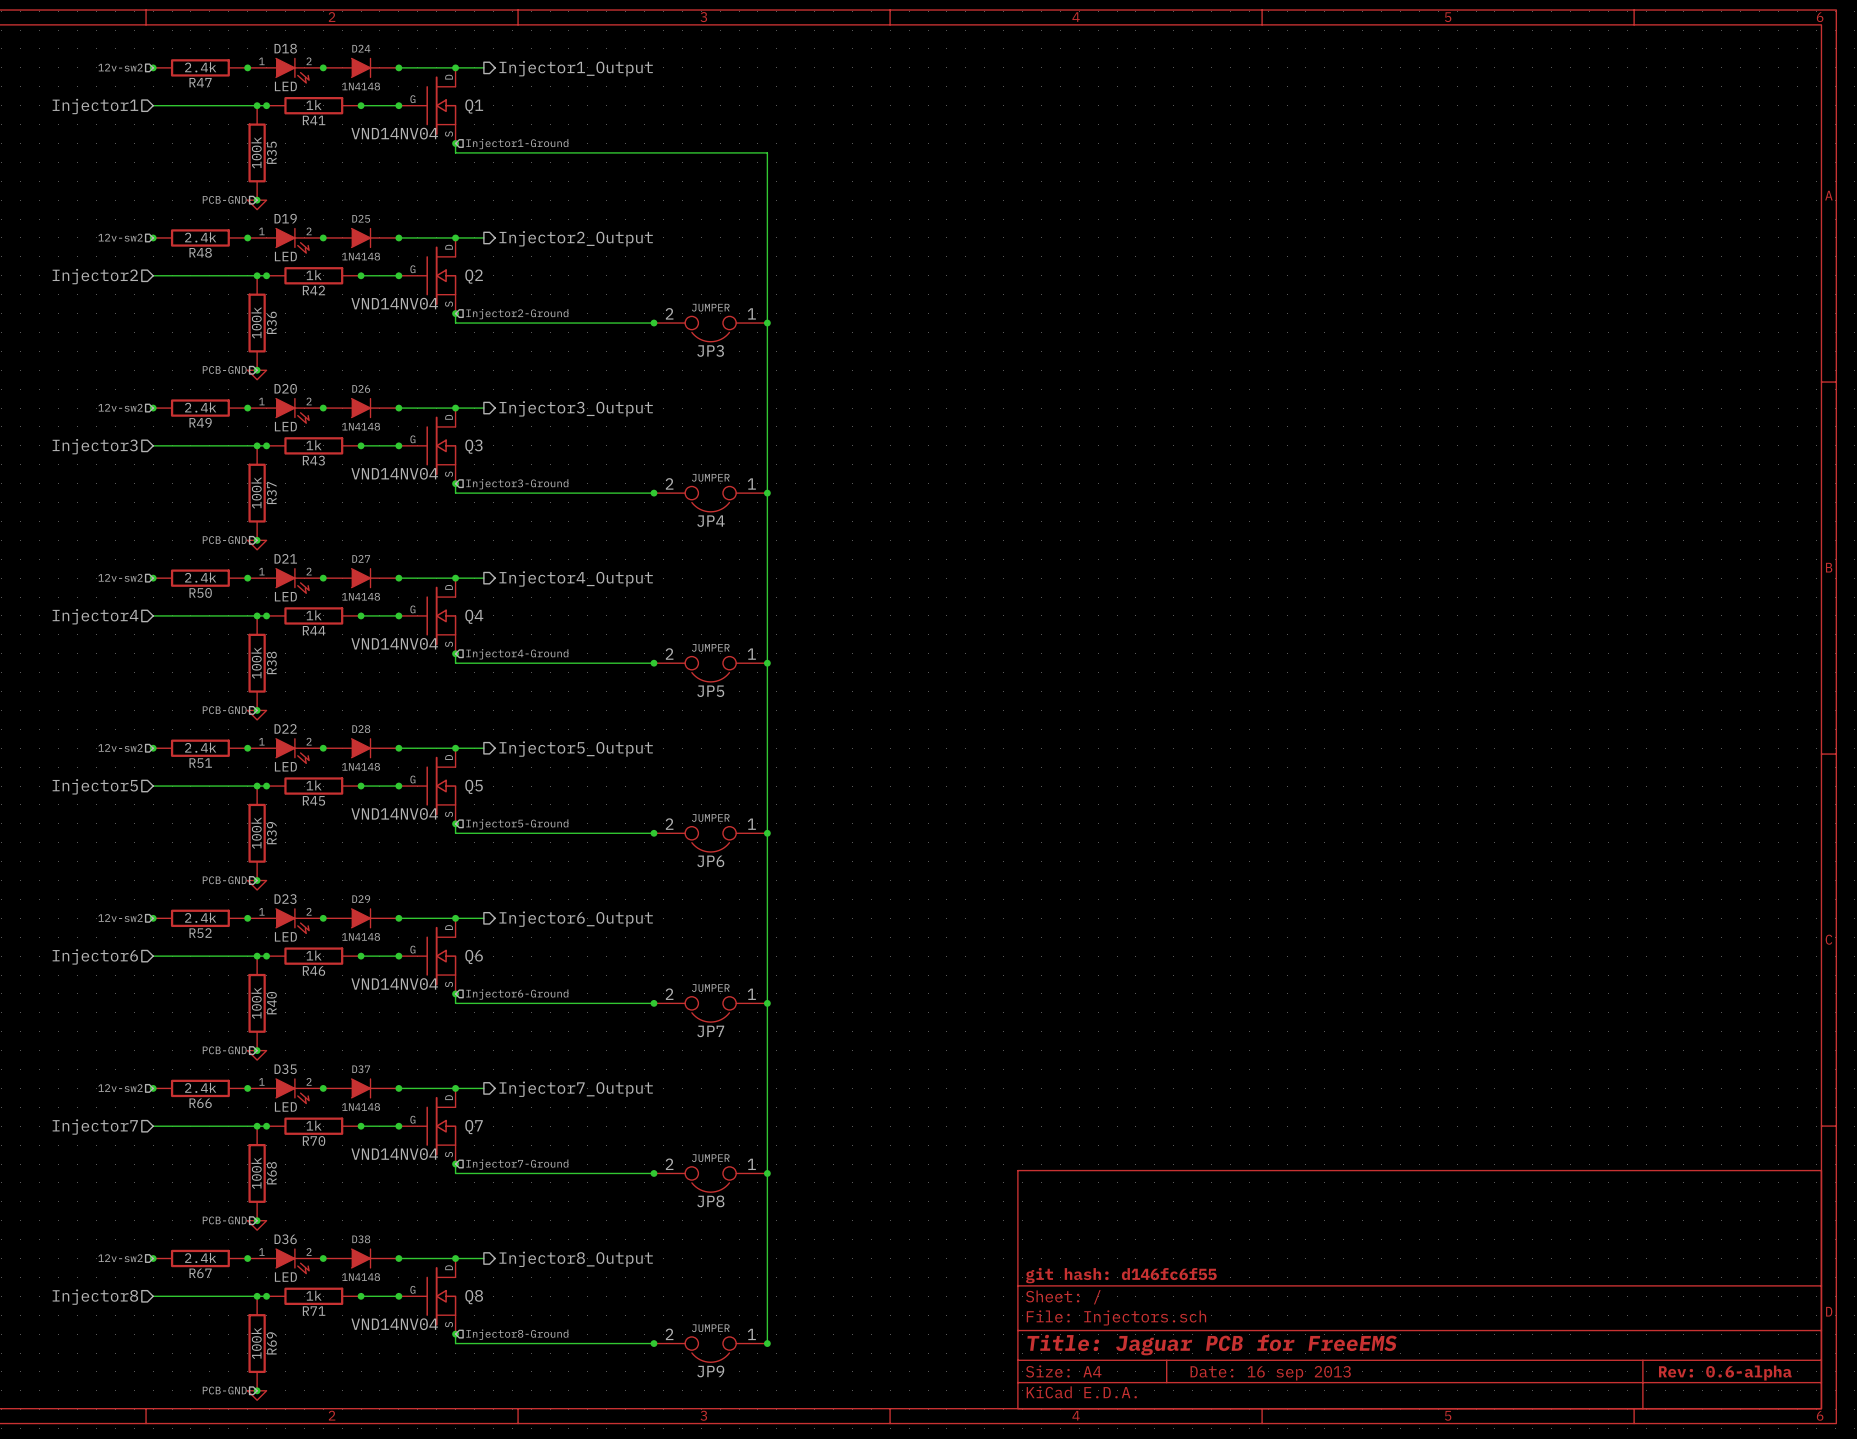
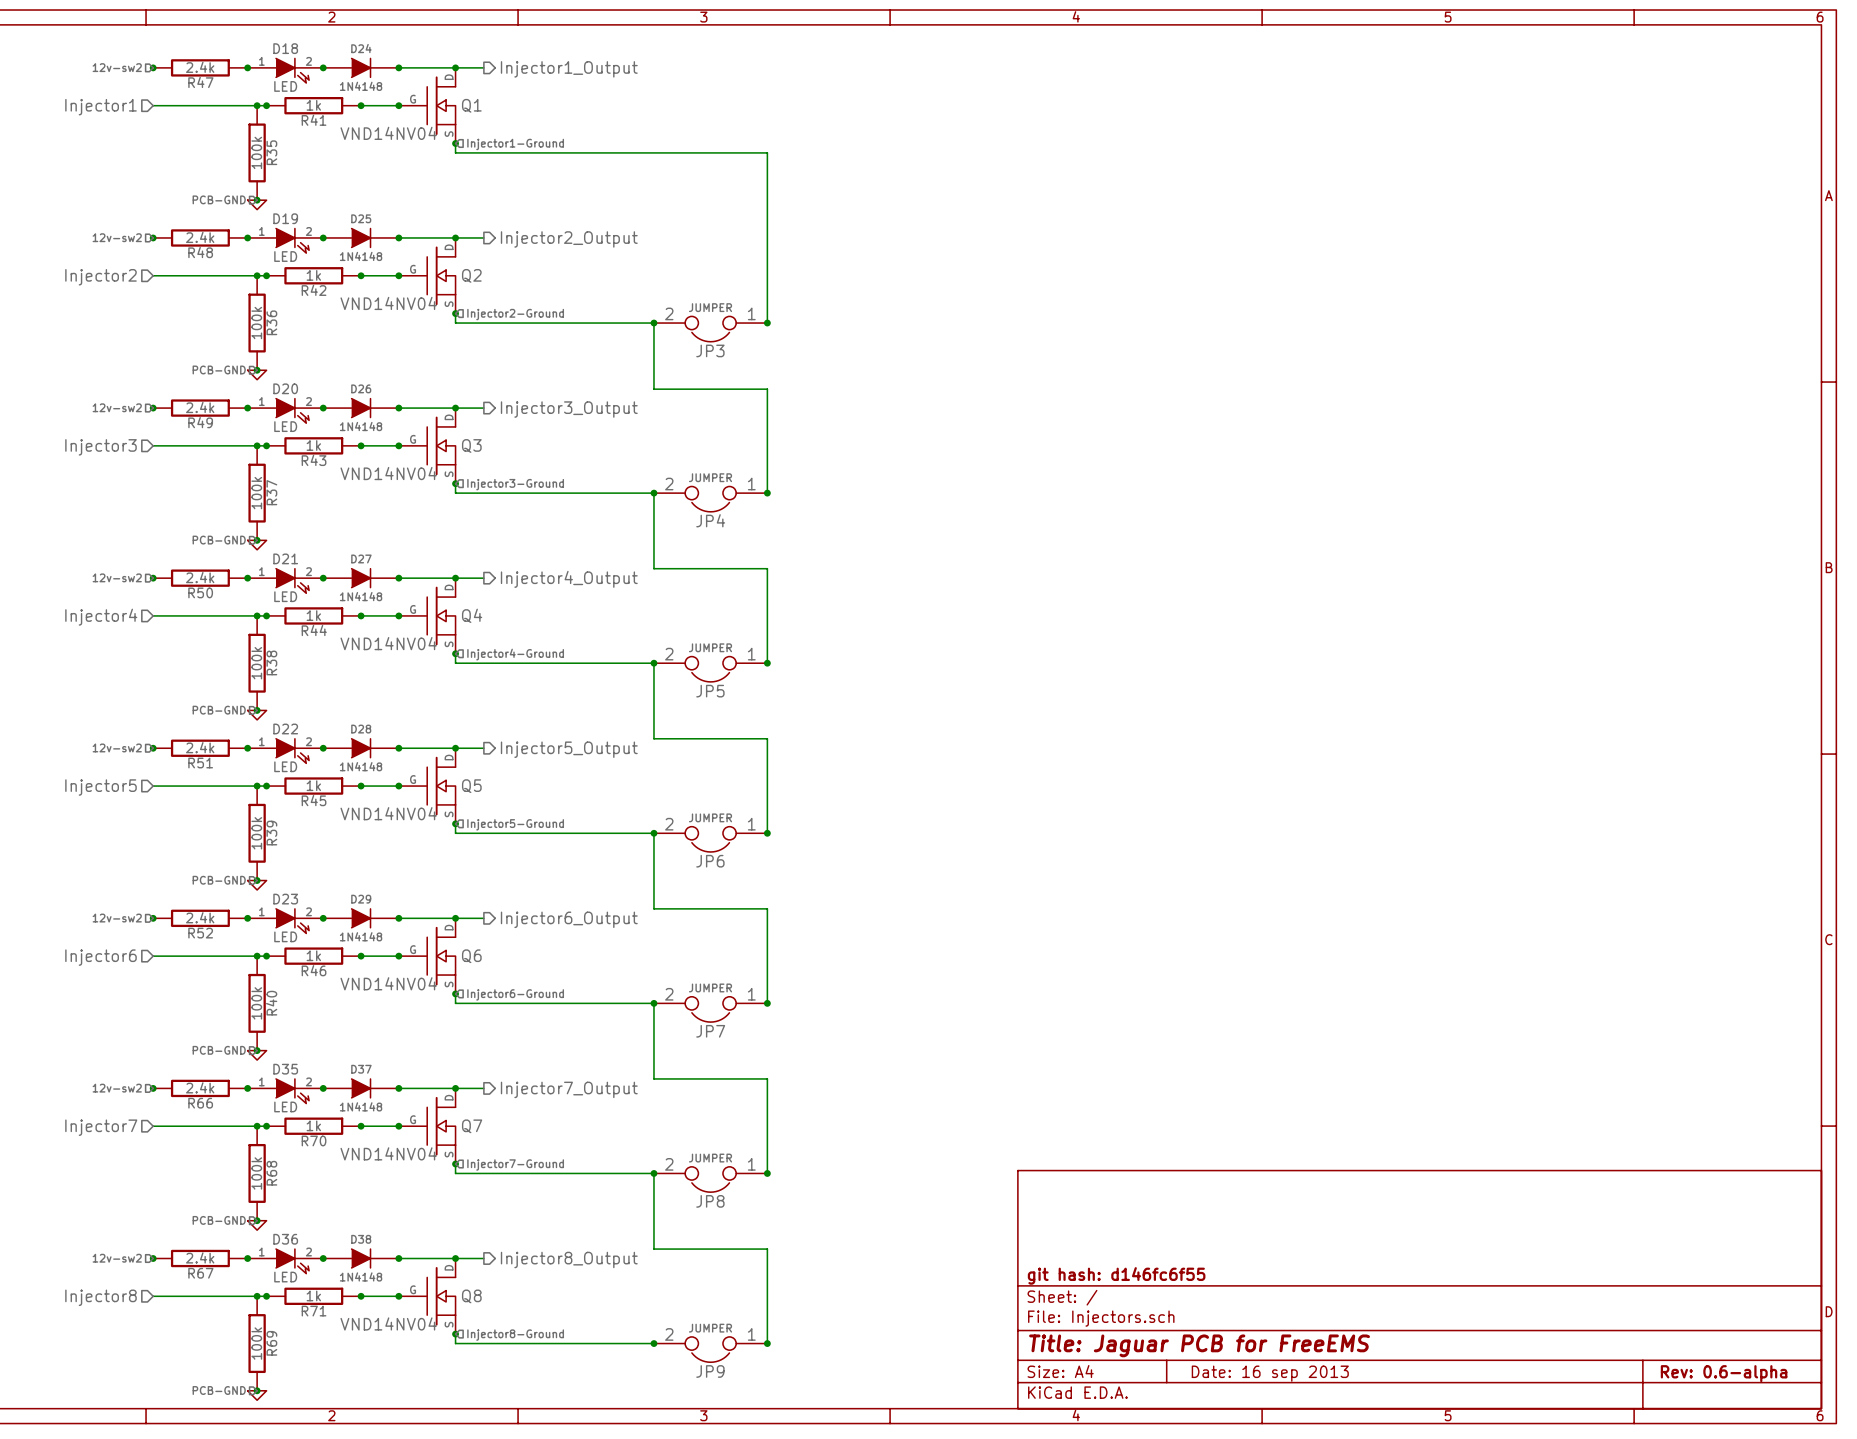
wire: (767, 323) (767, 389) -> (653, 323) (653, 389) (767, 389)
wire: (767, 493) (767, 568) -> (653, 493) (653, 568) (767, 568)
wire: (767, 663) (767, 738) -> (653, 663) (653, 738) (767, 738)
wire: (767, 833) (767, 908) -> (653, 833) (653, 908) (767, 908)
wire: (767, 1003) (767, 1078) -> (653, 1003) (653, 1078) (767, 1078)
wire: (767, 1173) (767, 1249) -> (653, 1173) (653, 1249) (767, 1249)

